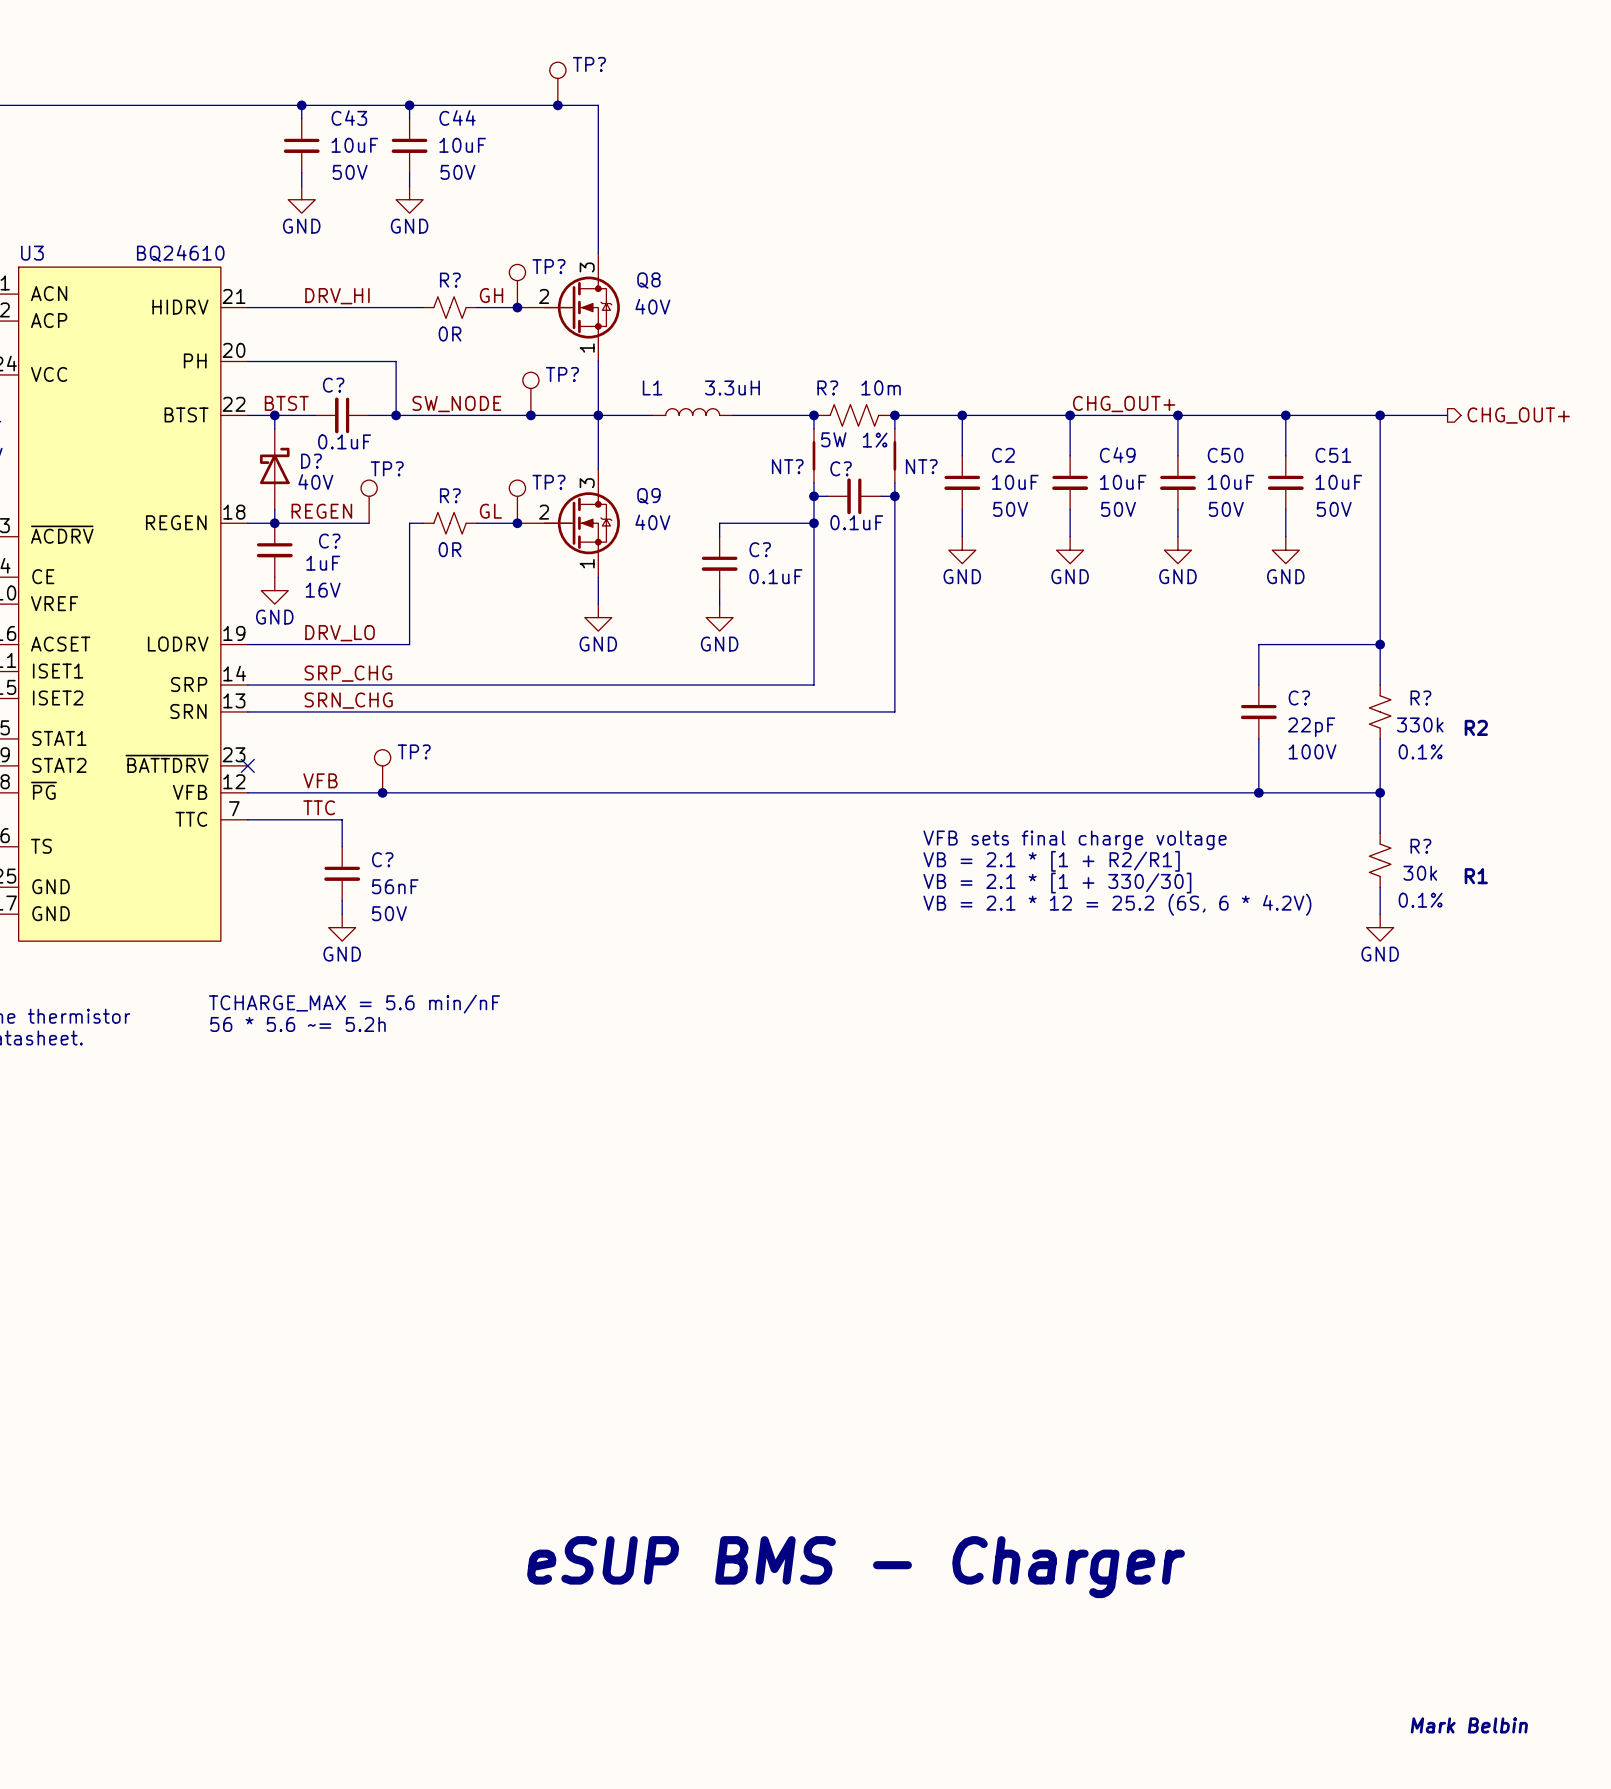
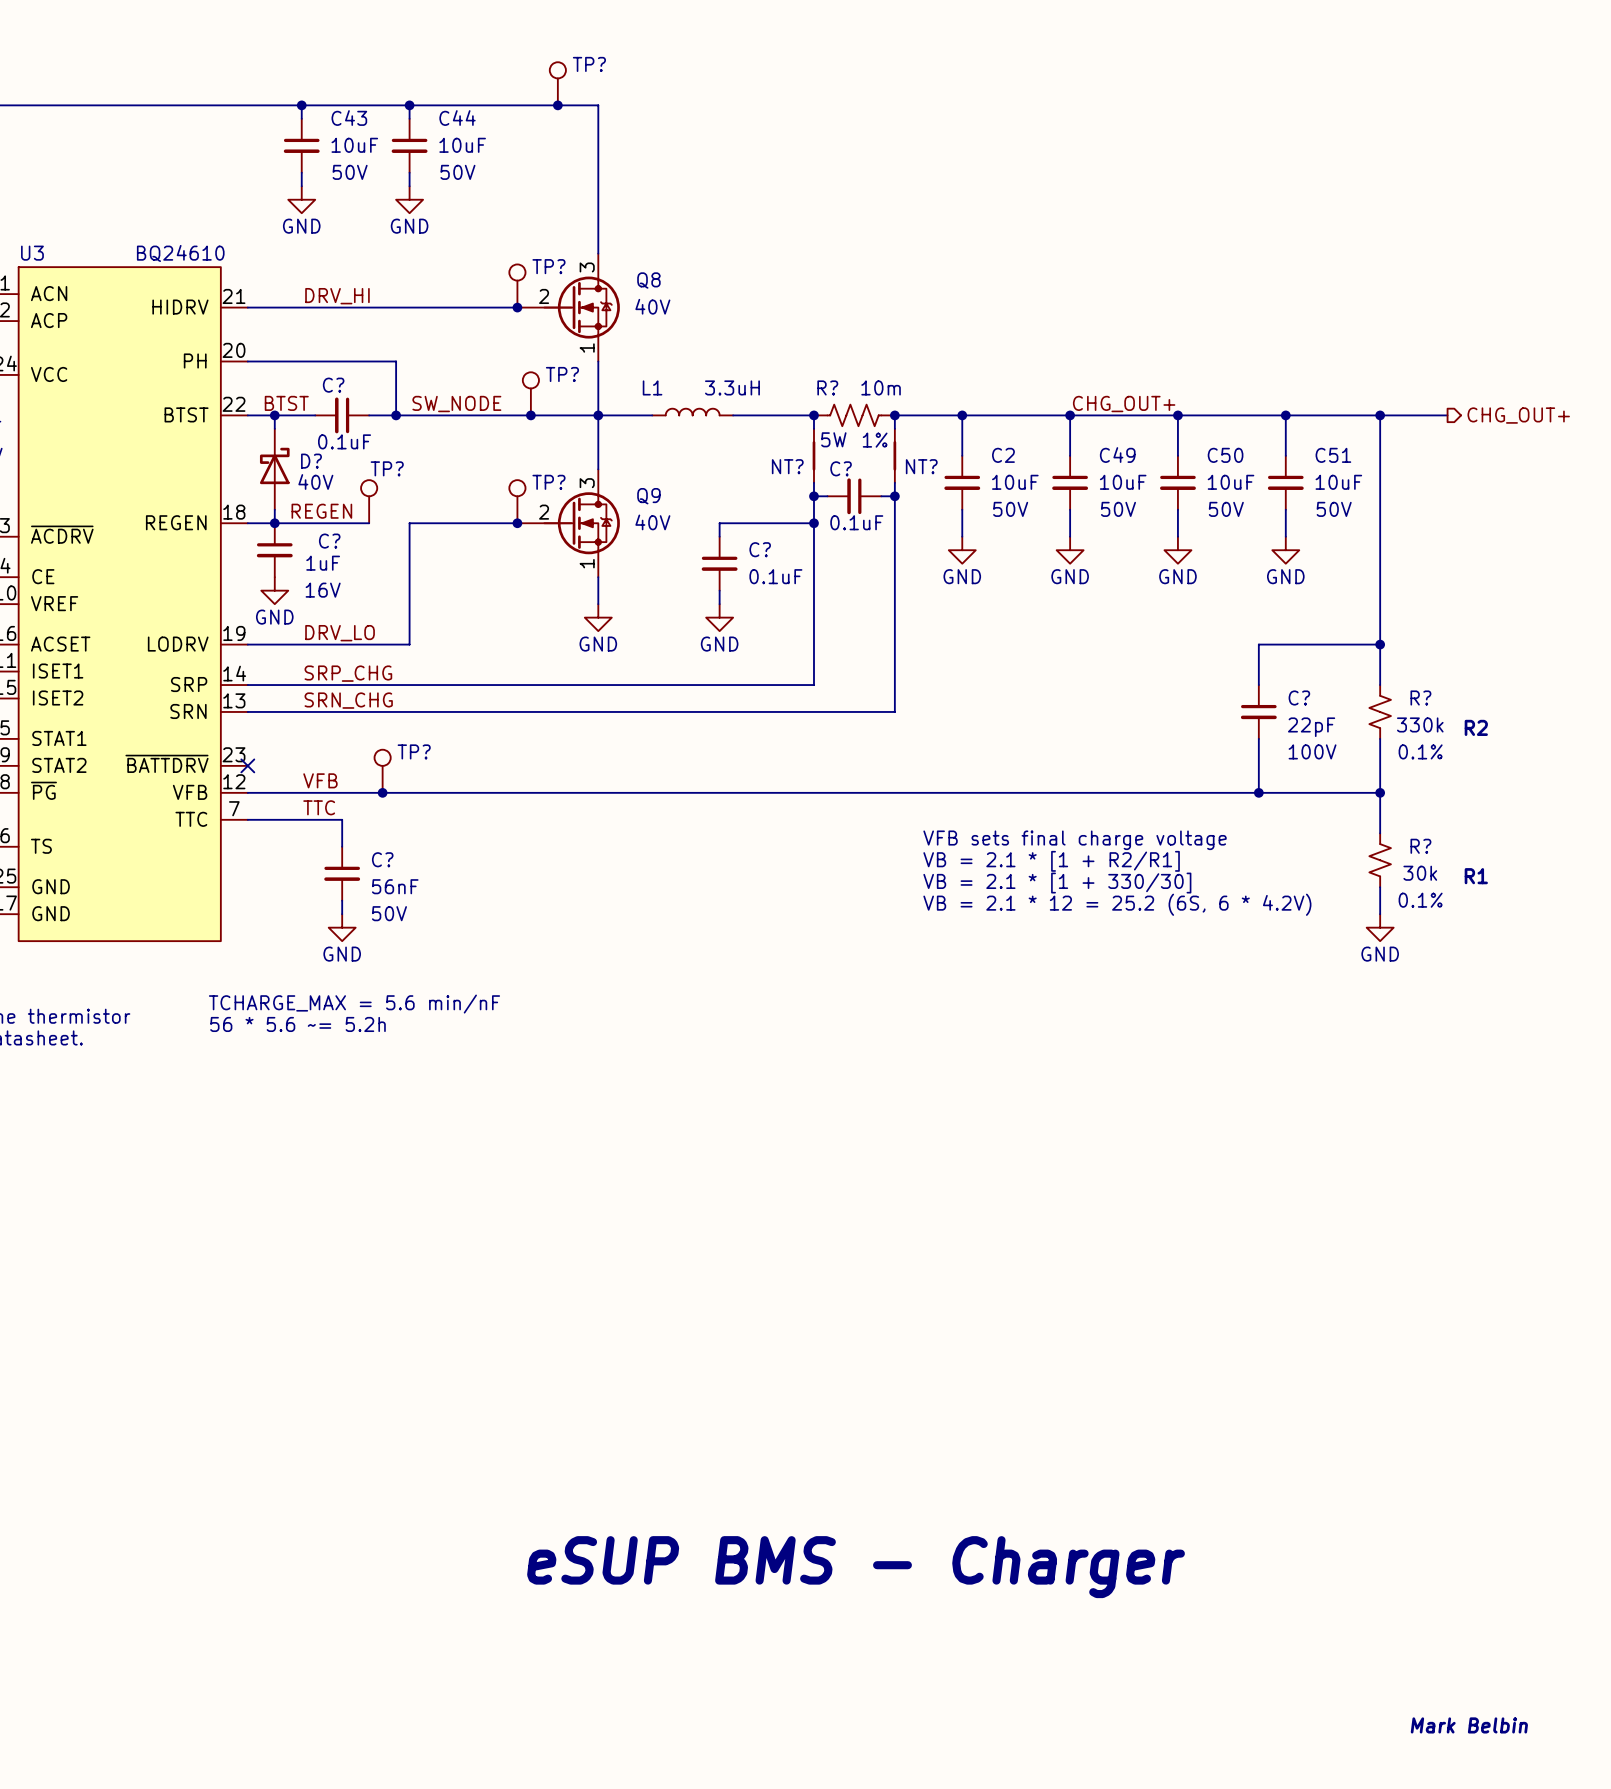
label: GH (491, 295) -> none
R?: 0R (450, 307) -> none
label: GL (490, 511) -> none
R?: 0R (450, 523) -> none

